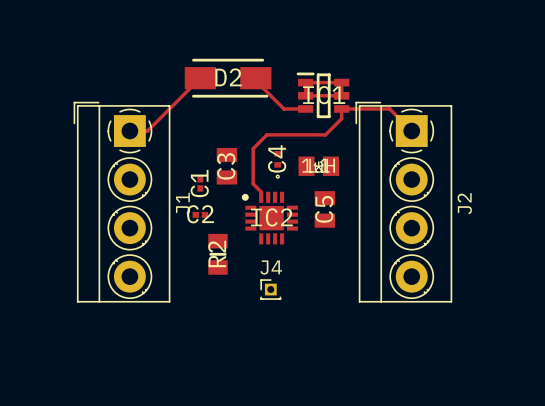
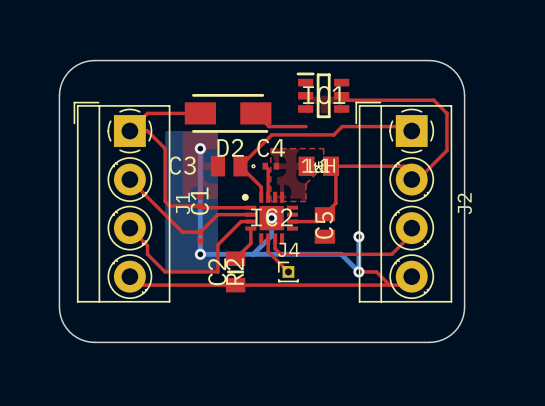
board edge: none -> (94, 60) (429, 60) (442, 63) (450, 67) (459, 78) (464, 95) (464, 307) (461, 320) (457, 328) (446, 337) (429, 342) (94, 342) (81, 339) (73, 335) (64, 324) (59, 307) (59, 91) (64, 78) (73, 67) (85, 61) (94, 60)
D2 name position: D2 (228, 77) -> D2 (230, 147)
top track: (200, 78) (147, 131) -> (250, 207) (169, 206) (165, 201) (165, 148) (147, 131)
D2 position: (228, 78) -> (228, 113)
top track: (255, 78) (255, 80) (284, 108) (305, 108) -> none
top track: (341, 95) (306, 95) (305, 82) (341, 82) (341, 95) -> none
top track: none -> (342, 100) (433, 100) (446, 113) (446, 150) (417, 179) (404, 166) (335, 166) (335, 203) (317, 221) (292, 221)
top track: none -> (200, 113) (147, 113) (129, 131)
top track: none -> (255, 113) (269, 126) (306, 126)
top track: (411, 131) (389, 108) (341, 108) (341, 118) (325, 134) -> (417, 131) (413, 126) (342, 126) (333, 134) (325, 134)
top track: (271, 134) (266, 134) (253, 148) (253, 183) (261, 191) -> (271, 134) (240, 166) (261, 187) (261, 191)
bottom track: none -> (200, 148) (200, 254) (341, 254) (358, 271) (358, 236)
via: none -> (200, 148)
top zone outline: none -> (270, 148) (270, 201) (306, 201) (306, 183) (323, 166) (323, 148) (270, 148)
C4 rotation: 0° (277, 164) -> 90° clockwise (265, 166)
C3 rotation: 0° (226, 166) -> 90° clockwise (229, 166)
C3 name position: C3 (226, 166) -> C3 (182, 165)
top track: none -> (265, 166) (268, 169) (268, 197)
top track: none -> (129, 179) (182, 232) (200, 232) (217, 214) (250, 214)
C1 position: (200, 183) -> (200, 201)
C5 position: (324, 209) -> (324, 225)
C2 rotation: 0° (200, 214) -> 90° clockwise (200, 236)
C2 position: (200, 214) -> (200, 236)
C2 name position: C2 (200, 214) -> C2 (217, 271)
bottom track: none -> (271, 218) (271, 235) (253, 254)
via: none -> (271, 218)
top track: none -> (250, 221) (241, 221) (217, 244) (217, 271) (165, 271) (147, 254) (147, 245) (129, 228)
top track: none -> (250, 228) (250, 243) (235, 258)
top track: none -> (417, 228) (391, 254) (280, 254) (275, 248) (275, 238)
via: none -> (358, 236)
top track: none -> (268, 238) (268, 251) (288, 271)
via: none -> (200, 254)
R2 position: (217, 254) -> (235, 271)
top track: none -> (358, 271) (376, 271) (389, 285)
via: none -> (358, 271)
top track: none -> (129, 276) (138, 285) (409, 285) (417, 276)
J4 position: (270, 289) -> (288, 271)

